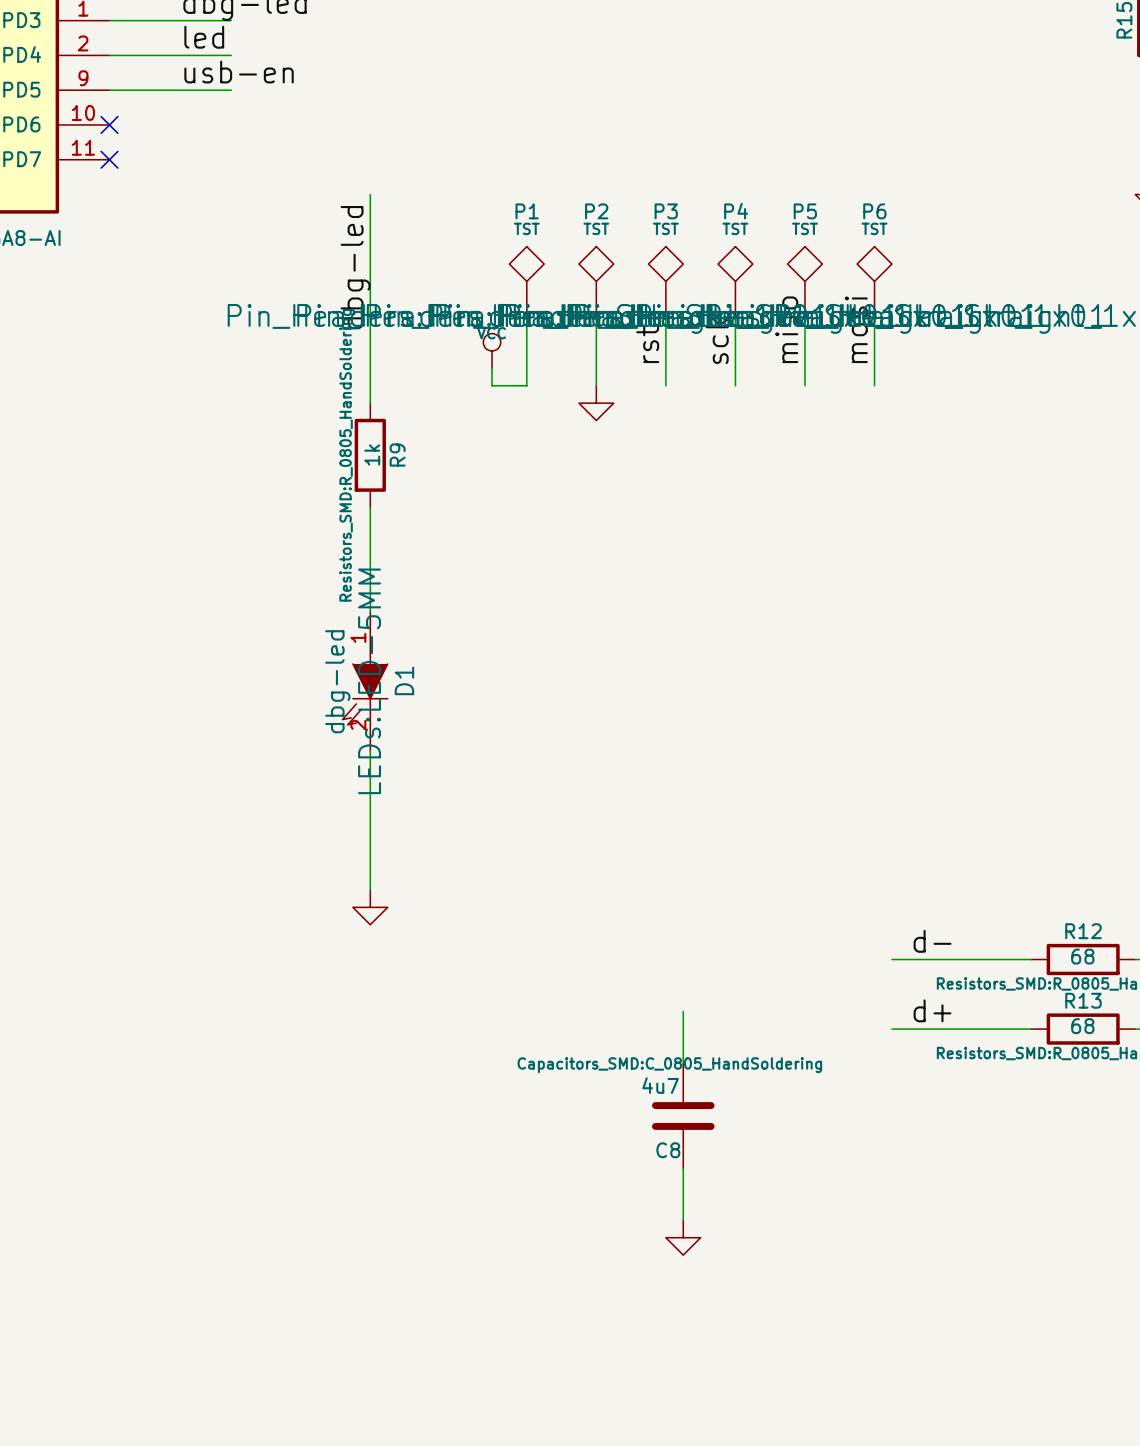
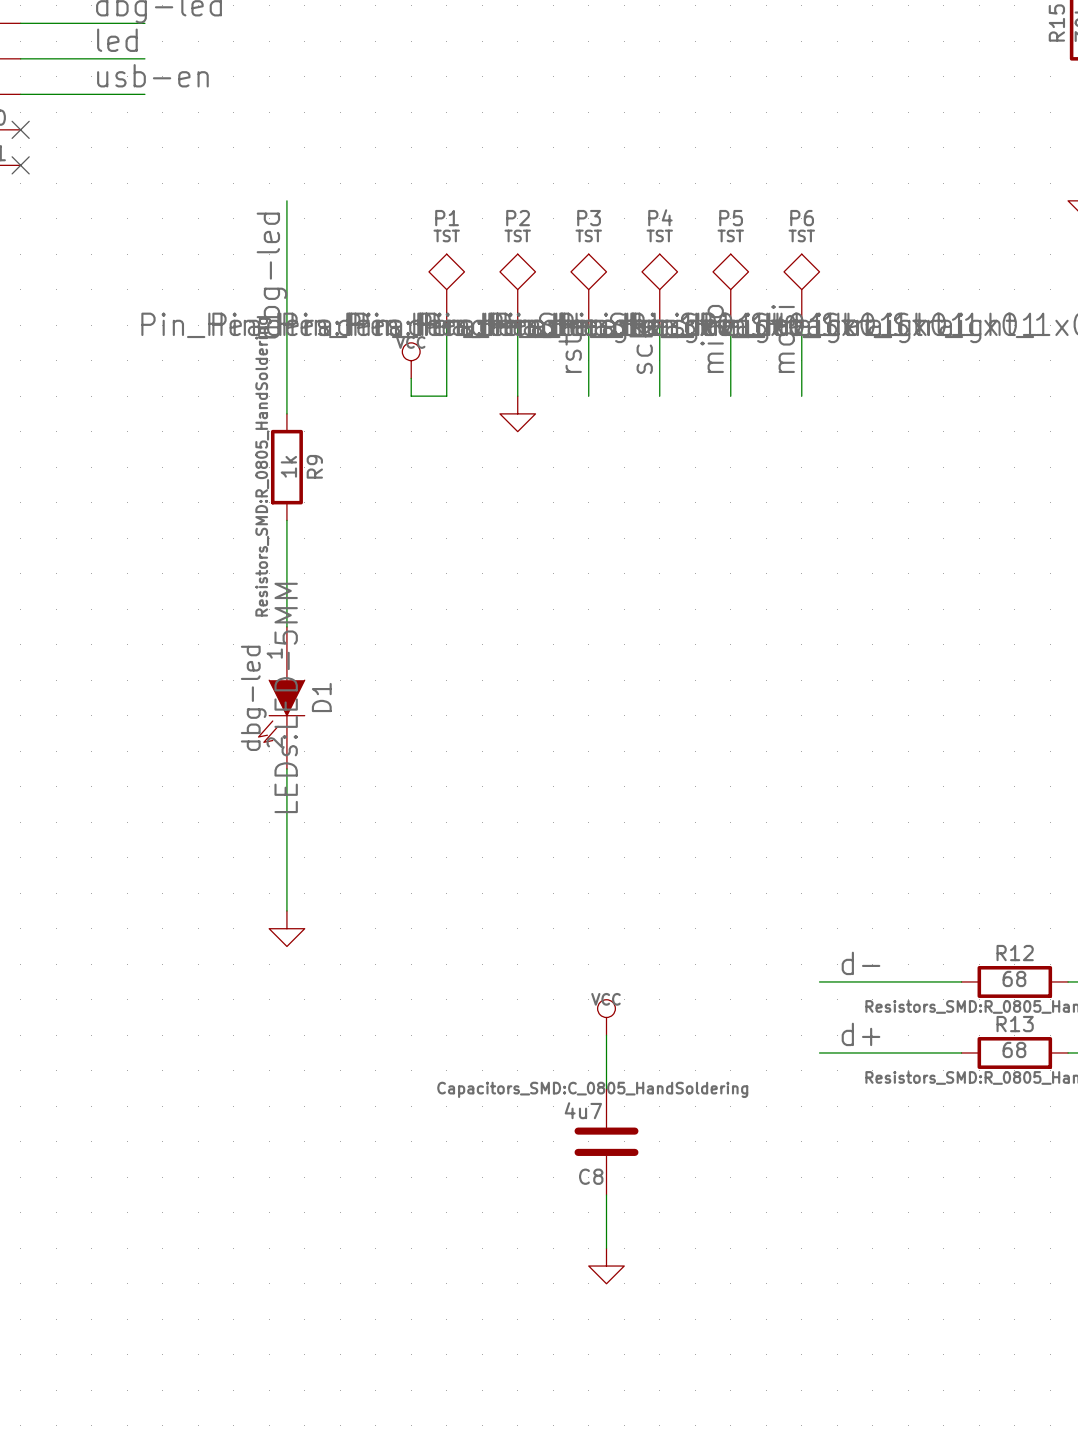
power symbol: none -> VCC (606, 1017)

